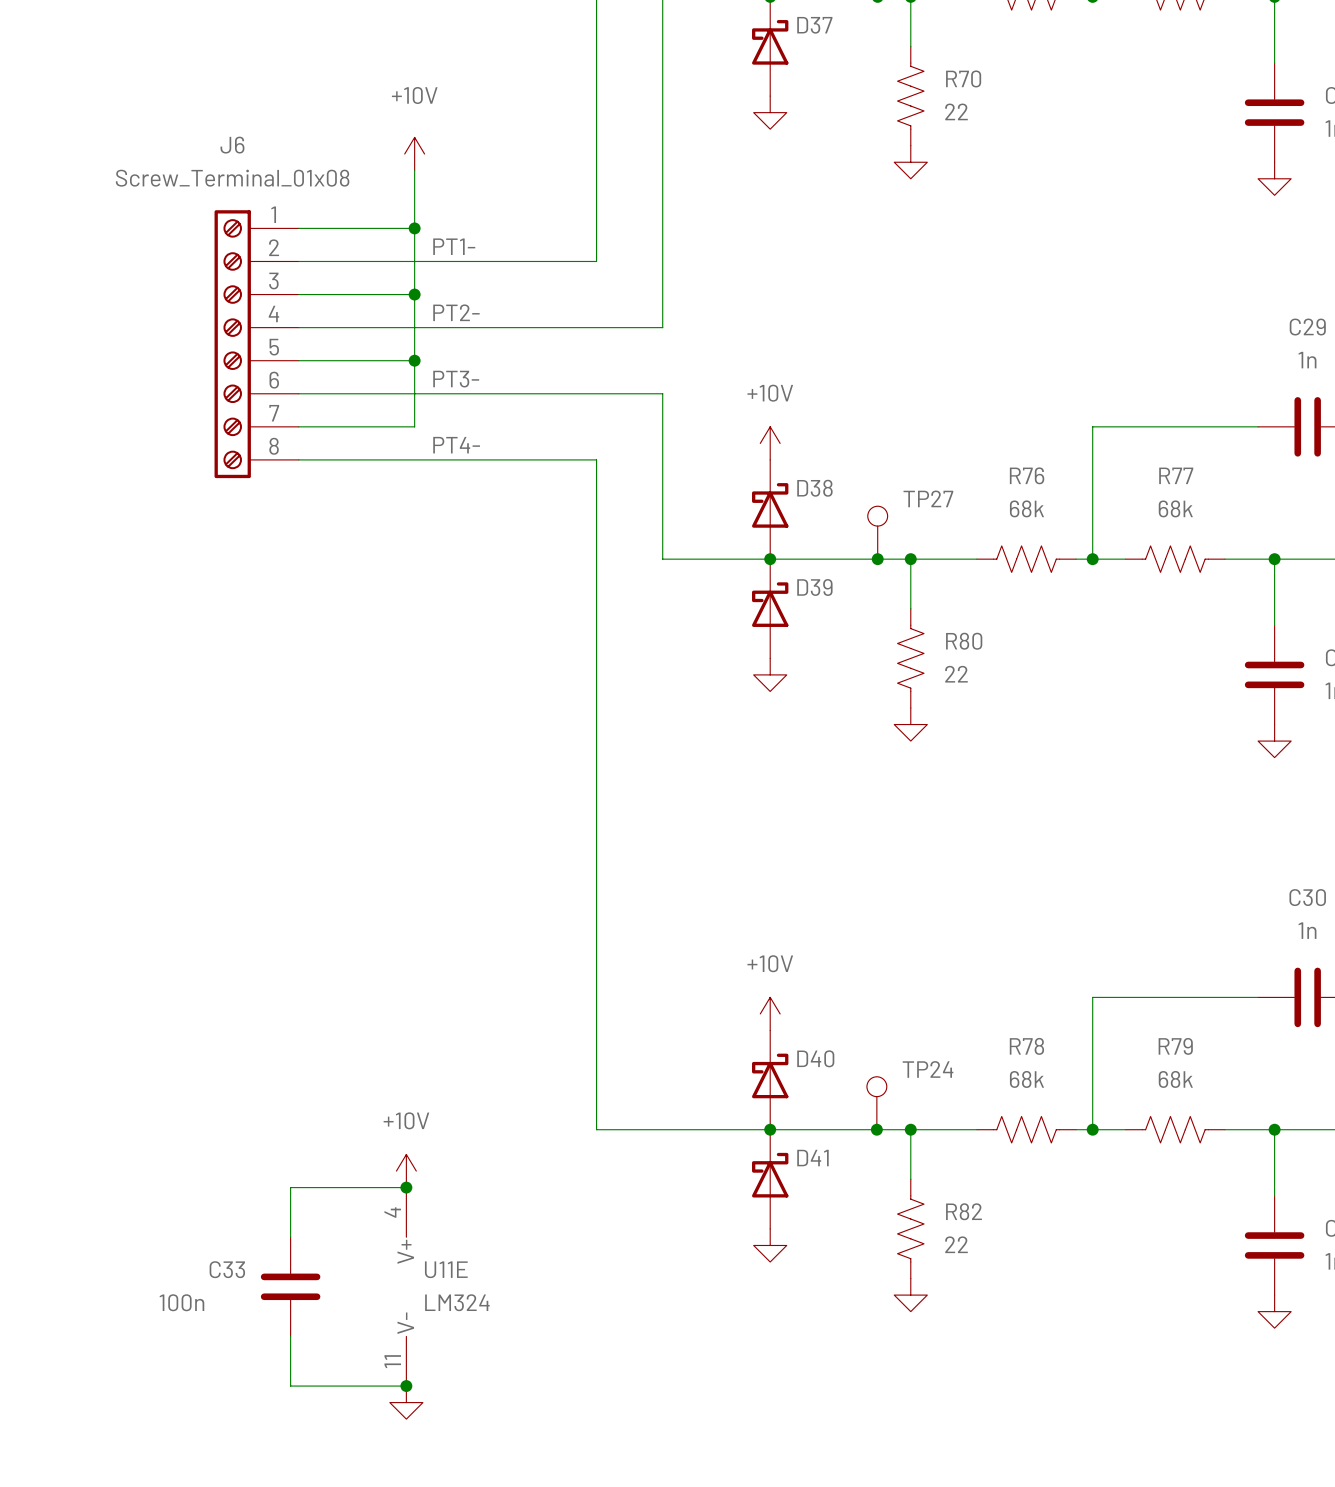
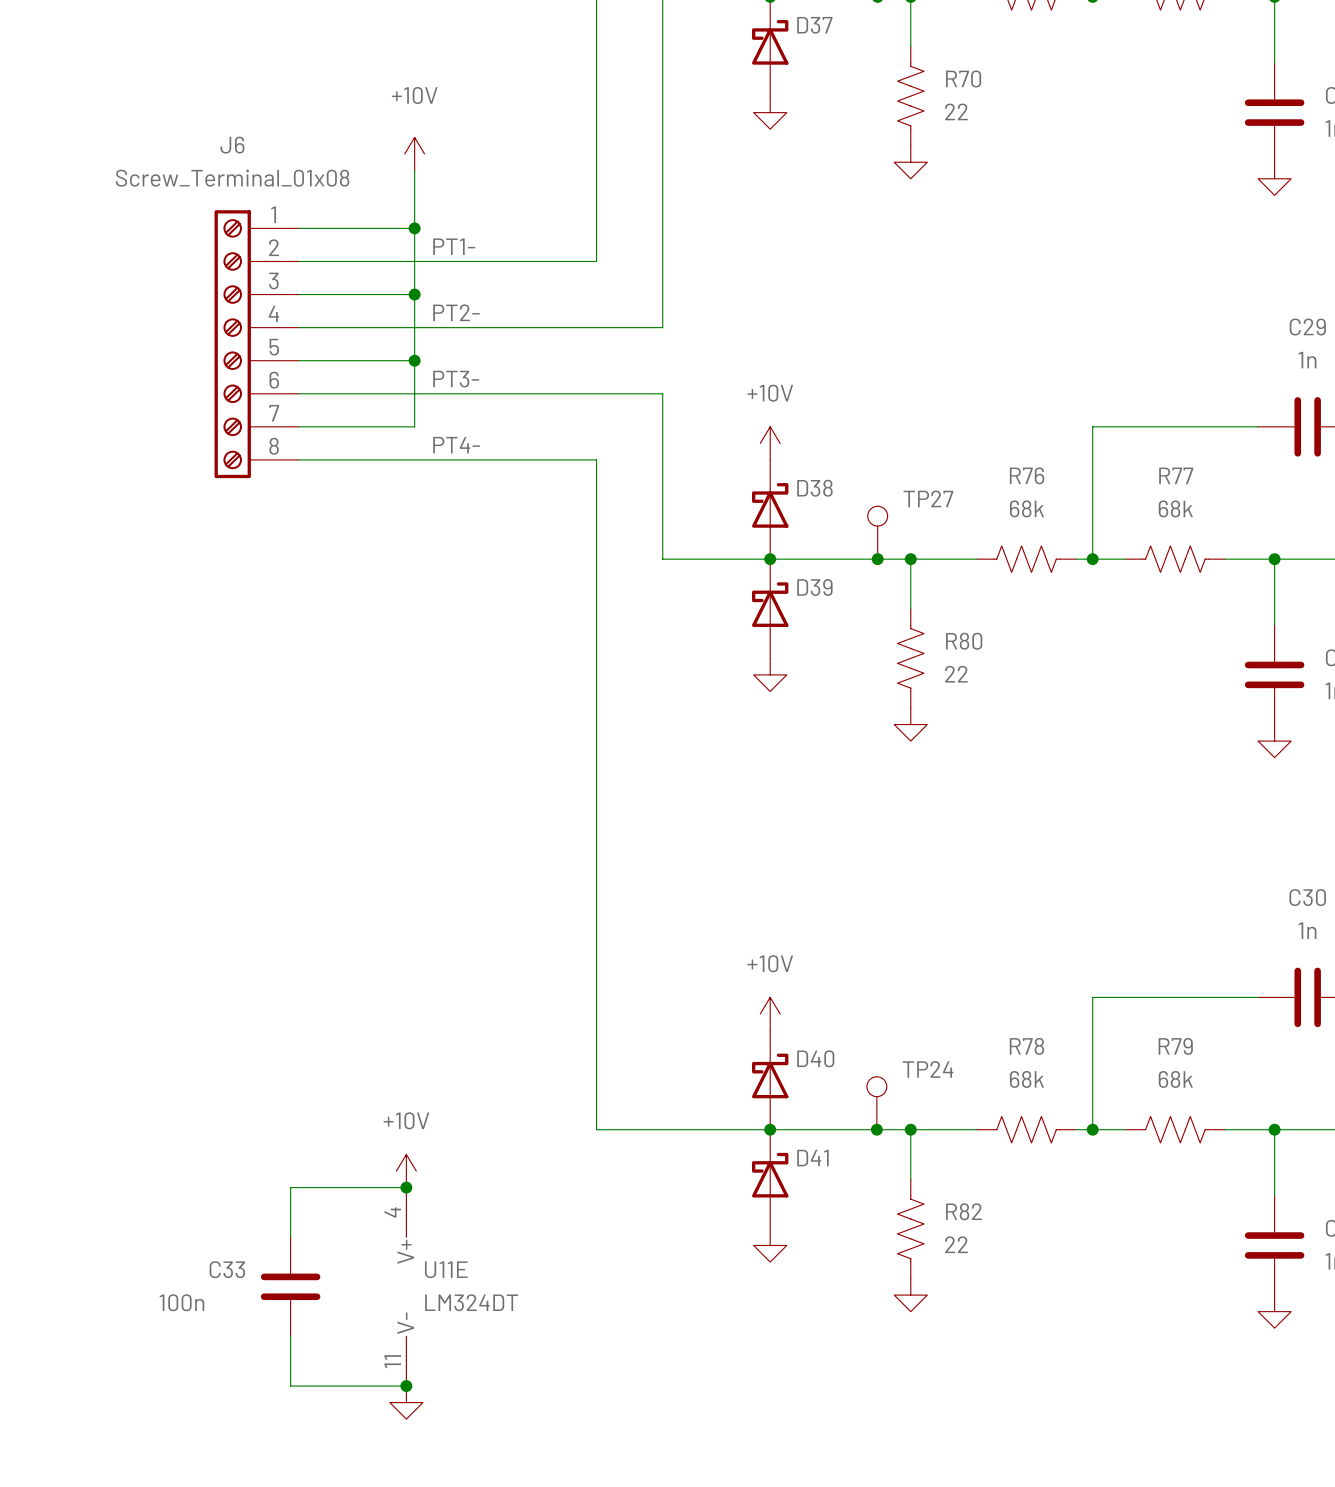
U11E value: LM324 (457, 1302) -> LM324DT (471, 1302)

